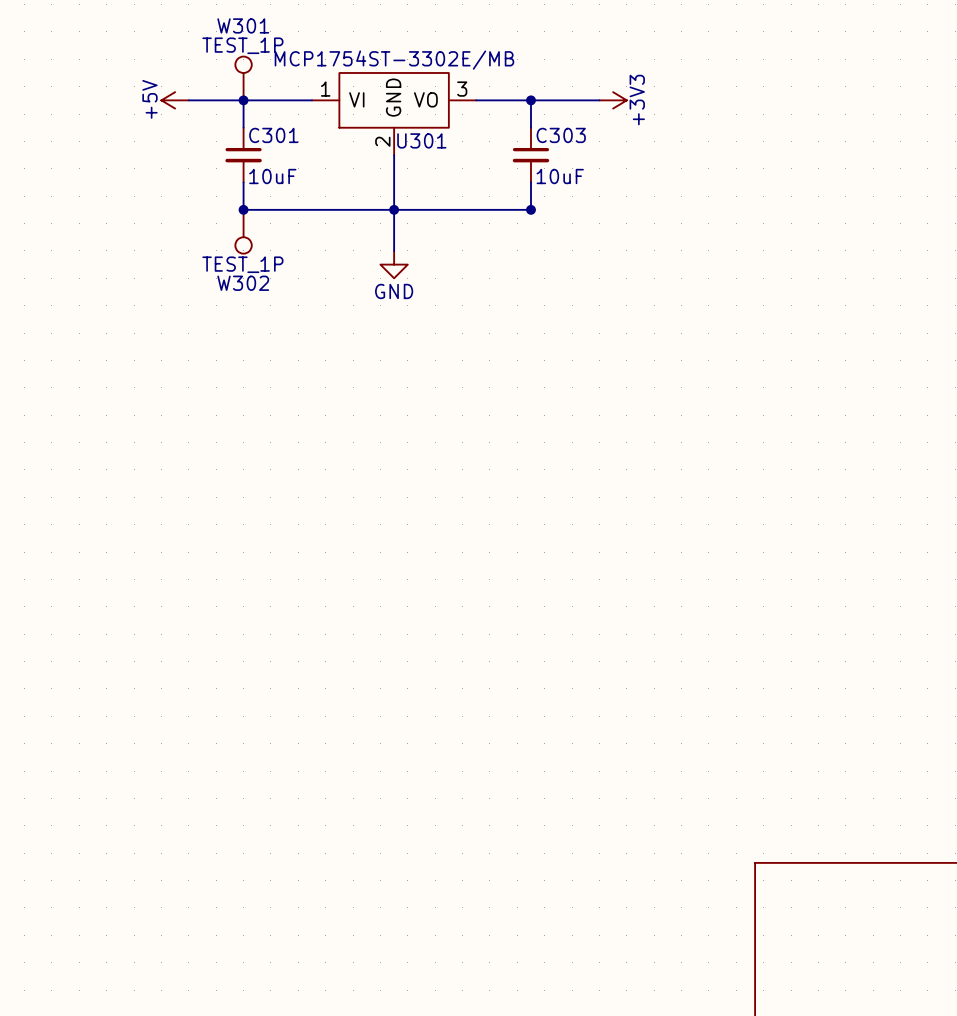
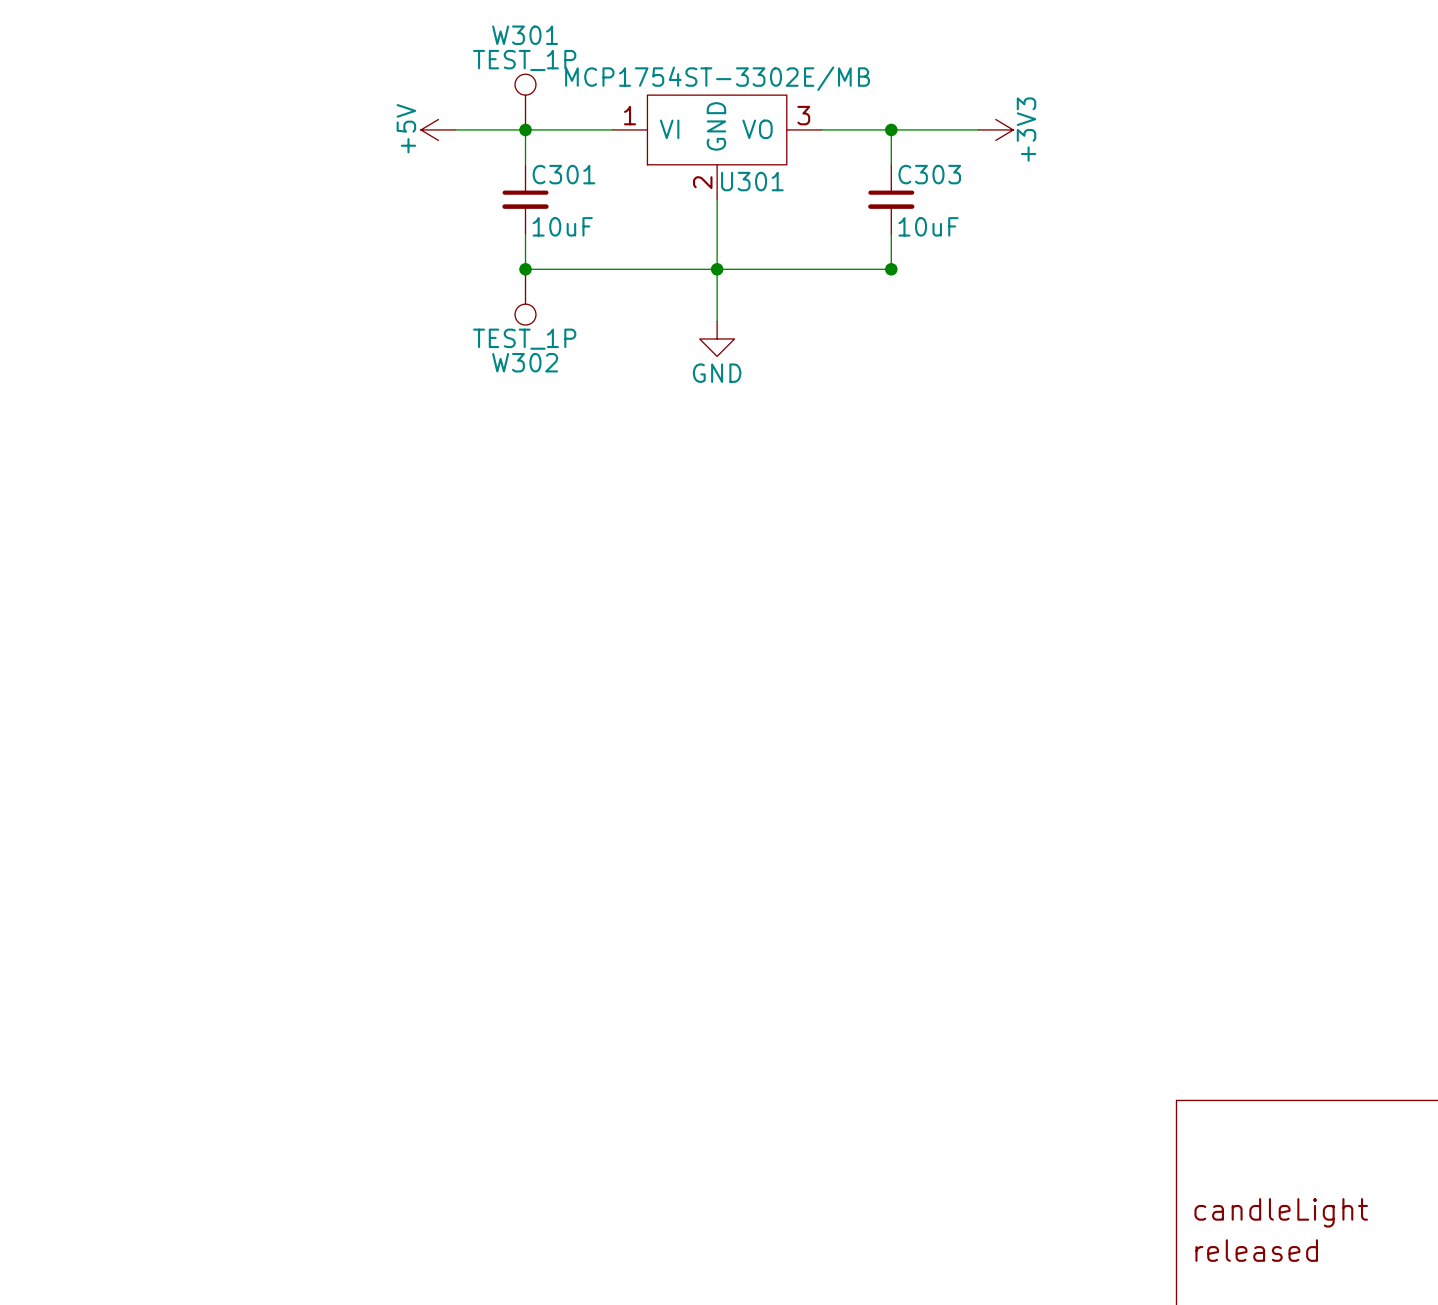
title block: none -> candleLight (1281, 1212)
title block: none -> released (1256, 1250)

